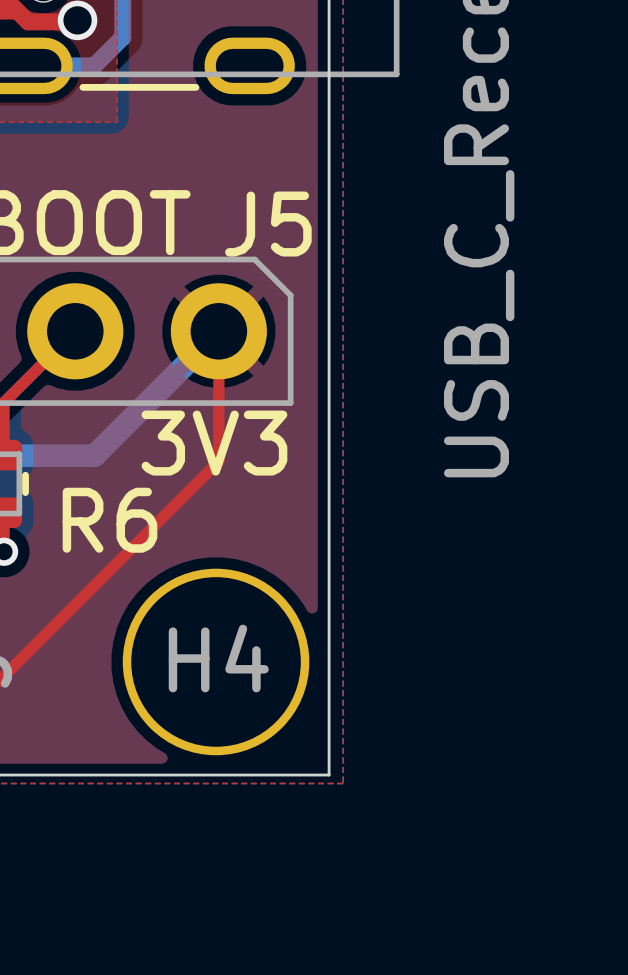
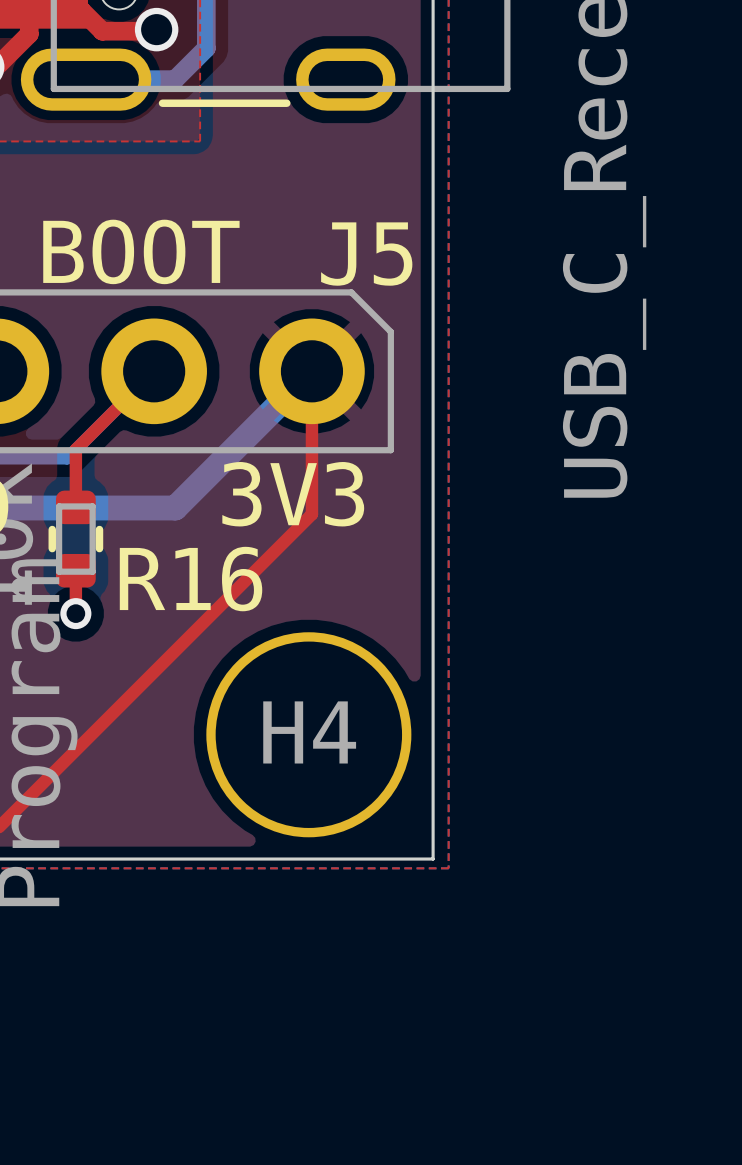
R6 name: R6 (109, 520) -> R16 (191, 579)

